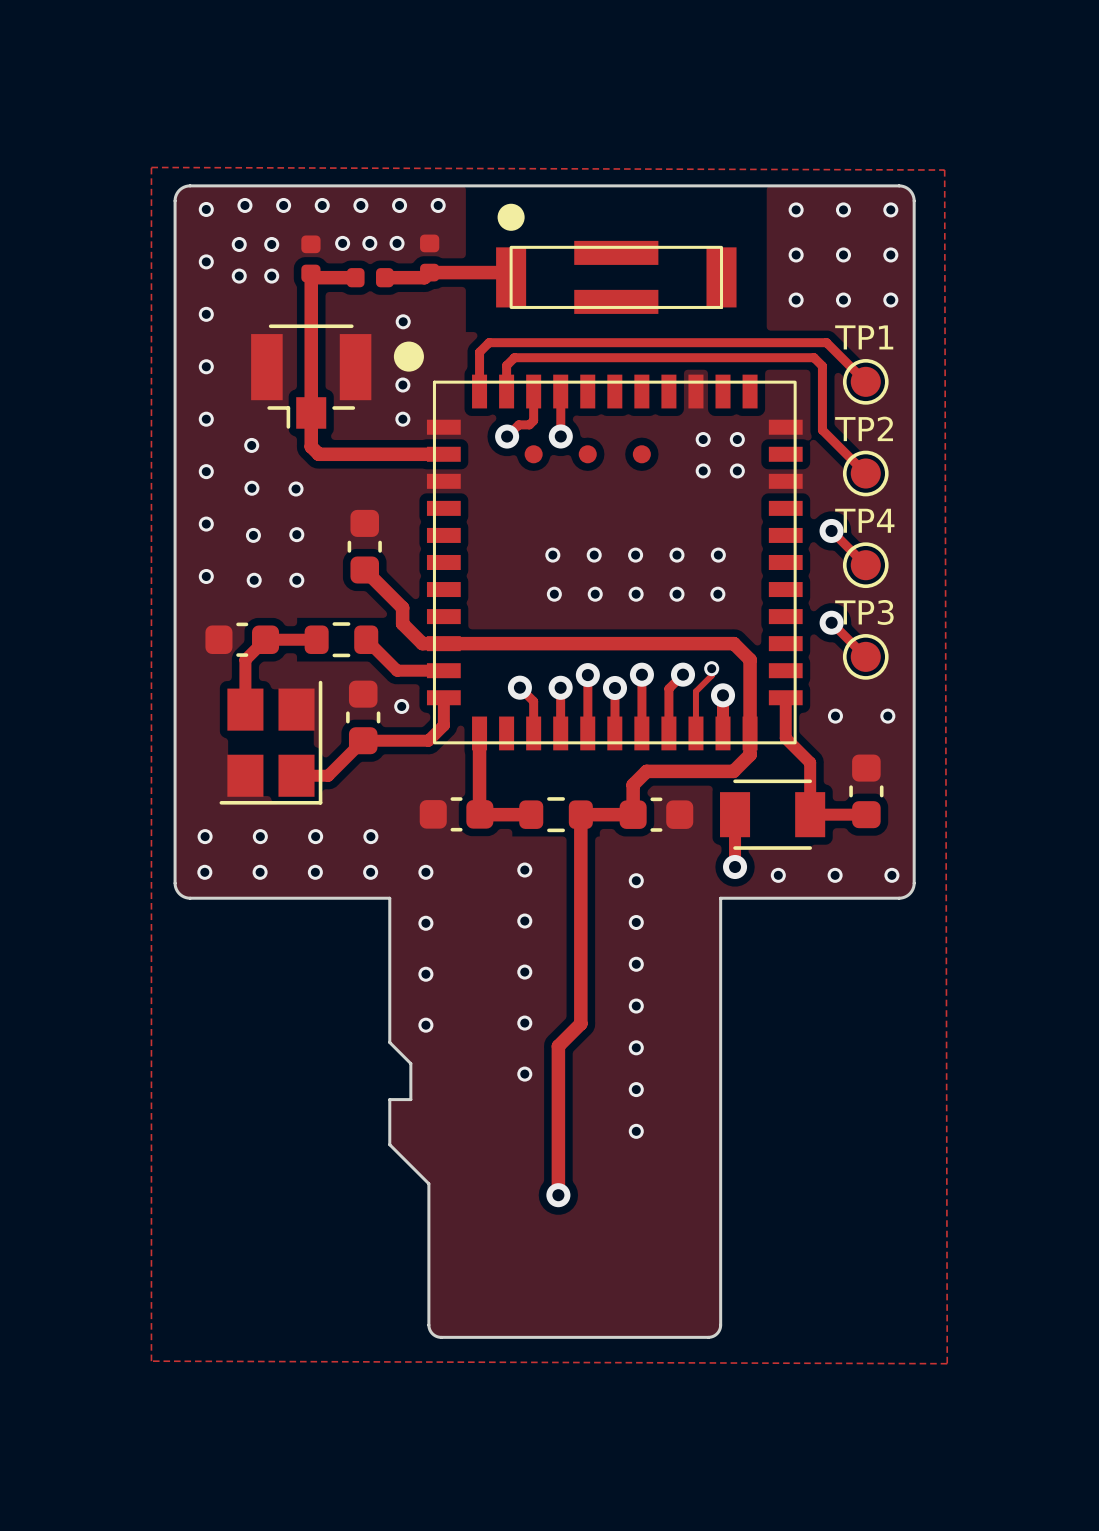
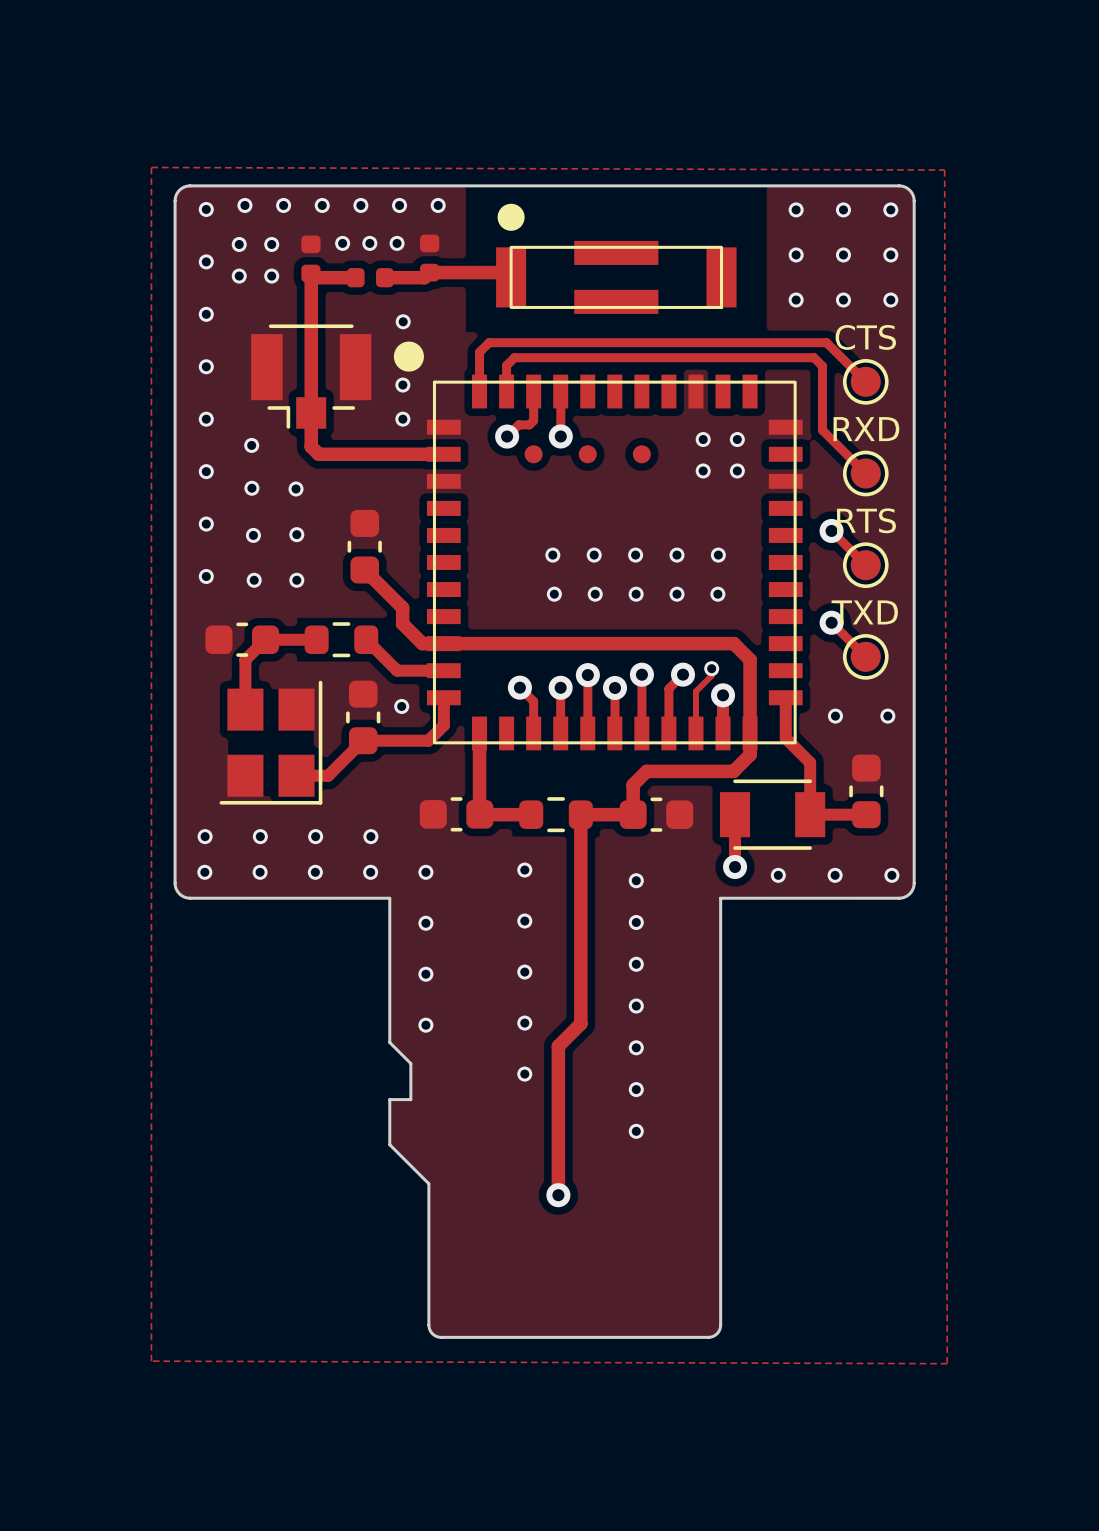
TP1 name: TP1 (864, 337) -> CTS (865, 337)
TP2 name: TP2 (864, 428) -> RXD (866, 429)
TP4 name: TP4 (864, 520) -> RTS (866, 520)
TP3 name: TP3 (864, 612) -> TXD (864, 612)

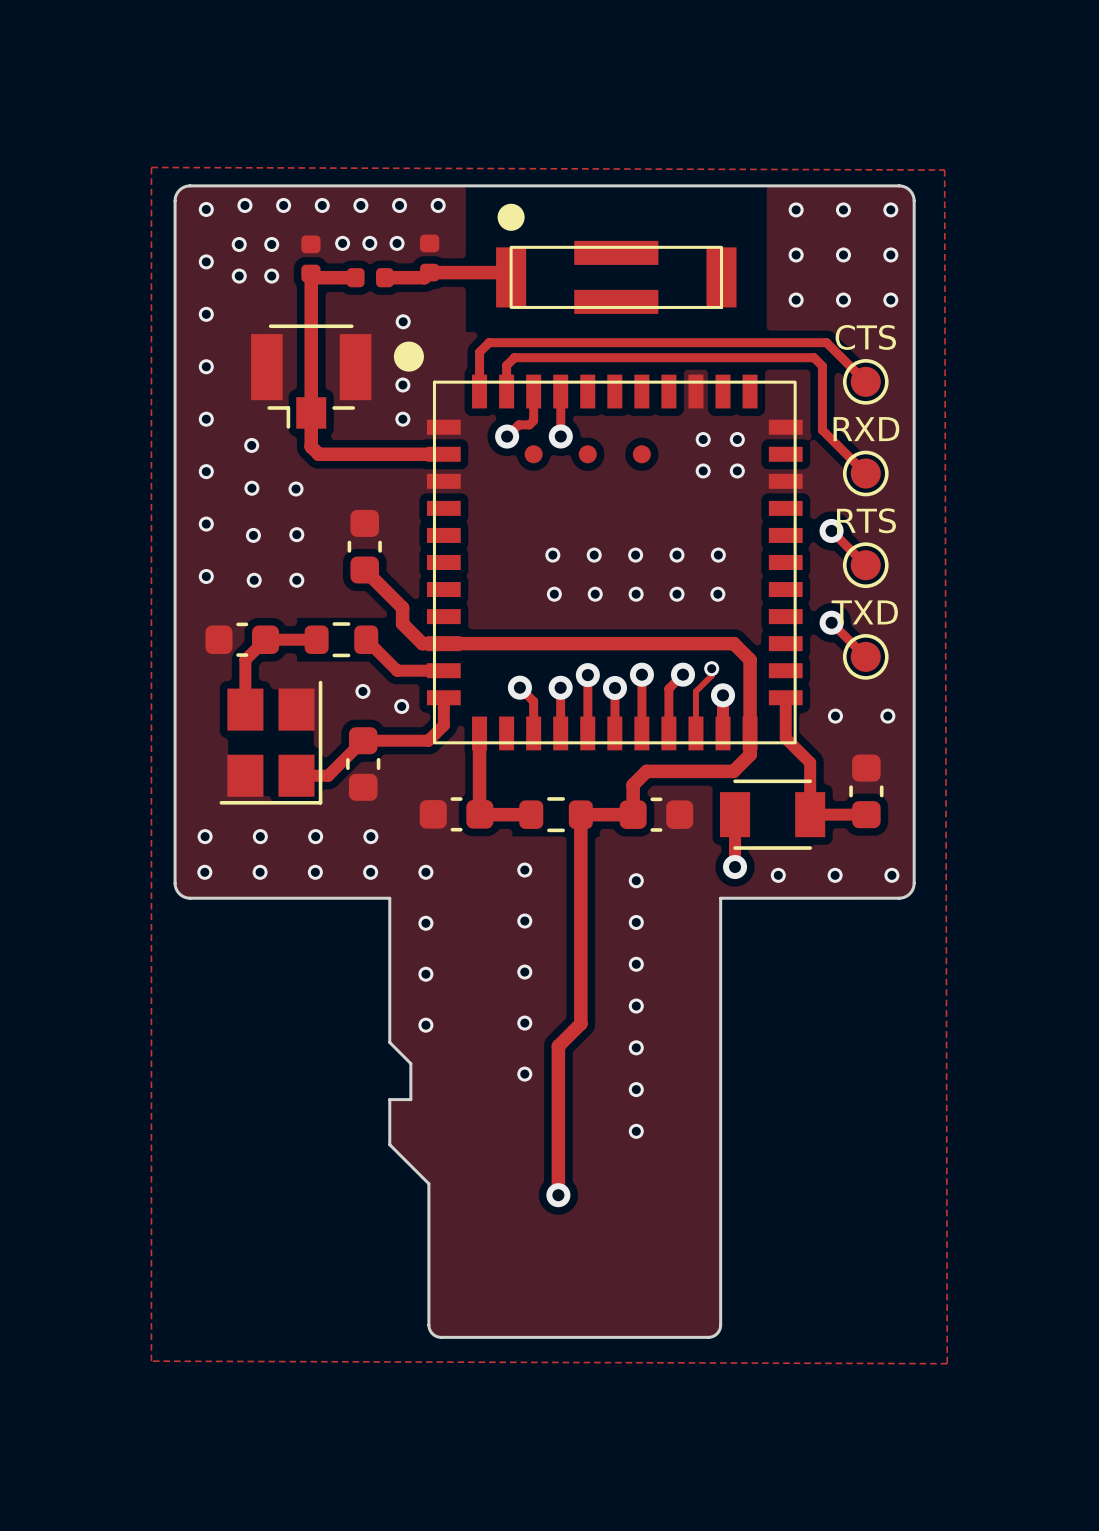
via: none -> (362, 691)
part position: (363, 717) -> (363, 764)

